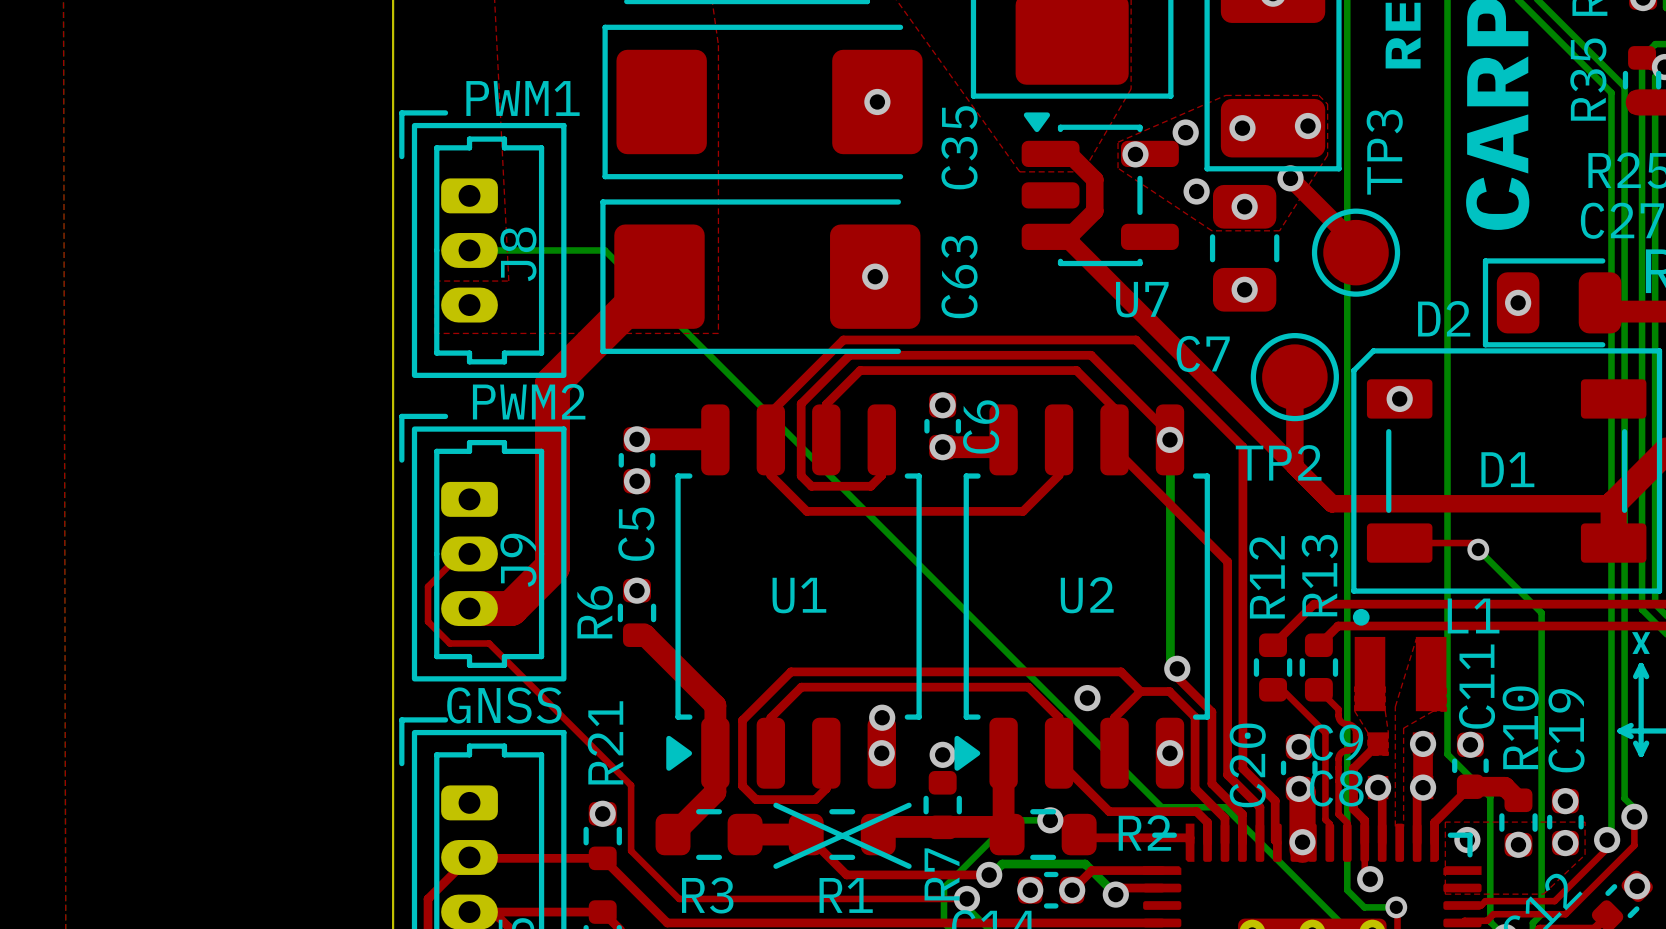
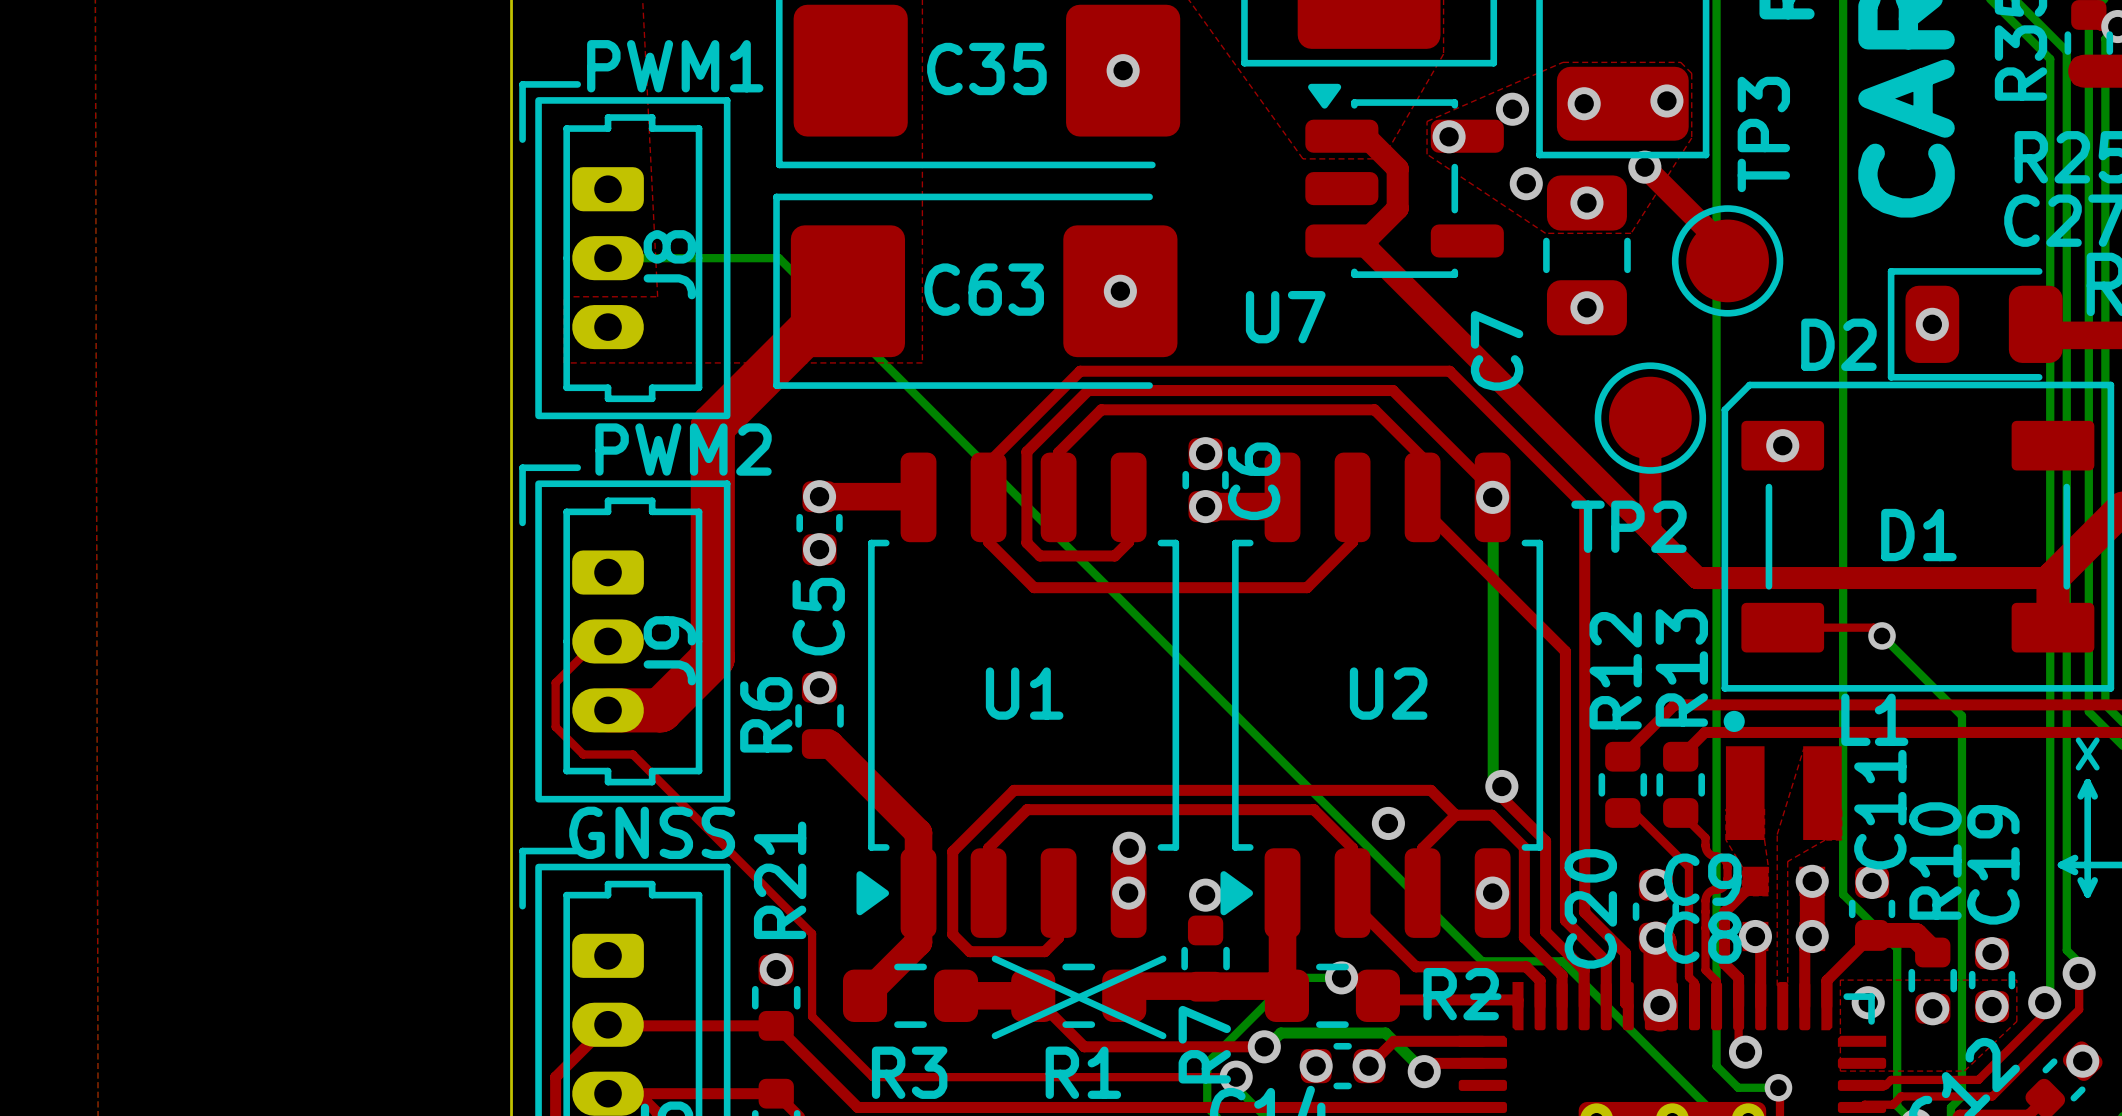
C35 name rotation: 0° (959, 147) -> 90° clockwise (986, 69)
C35 name position: C35 (959, 147) -> C35 (986, 69)
C63 name rotation: 0° (959, 276) -> 90° clockwise (984, 289)
C63 name position: C63 (959, 276) -> C63 (984, 289)
U7 name position: U7 (1142, 299) -> U7 (1285, 317)
C7 name rotation: 0° (1203, 353) -> 90° counterclockwise (1497, 350)

